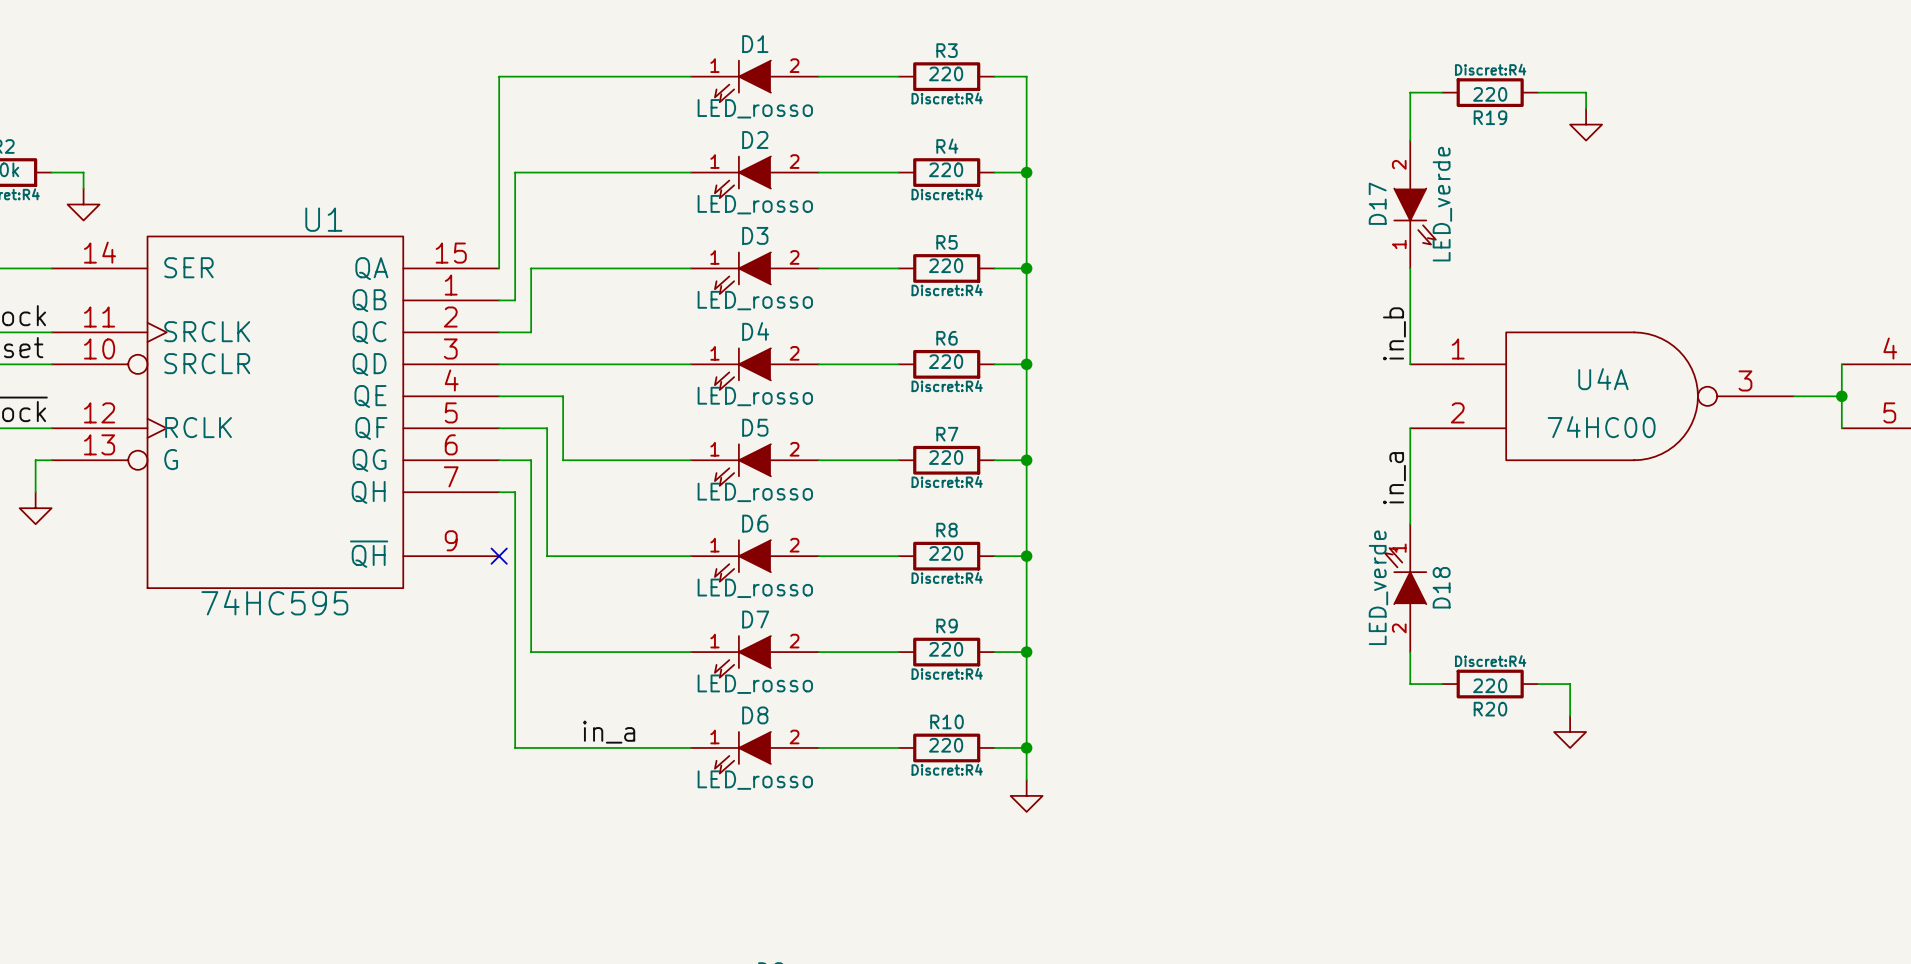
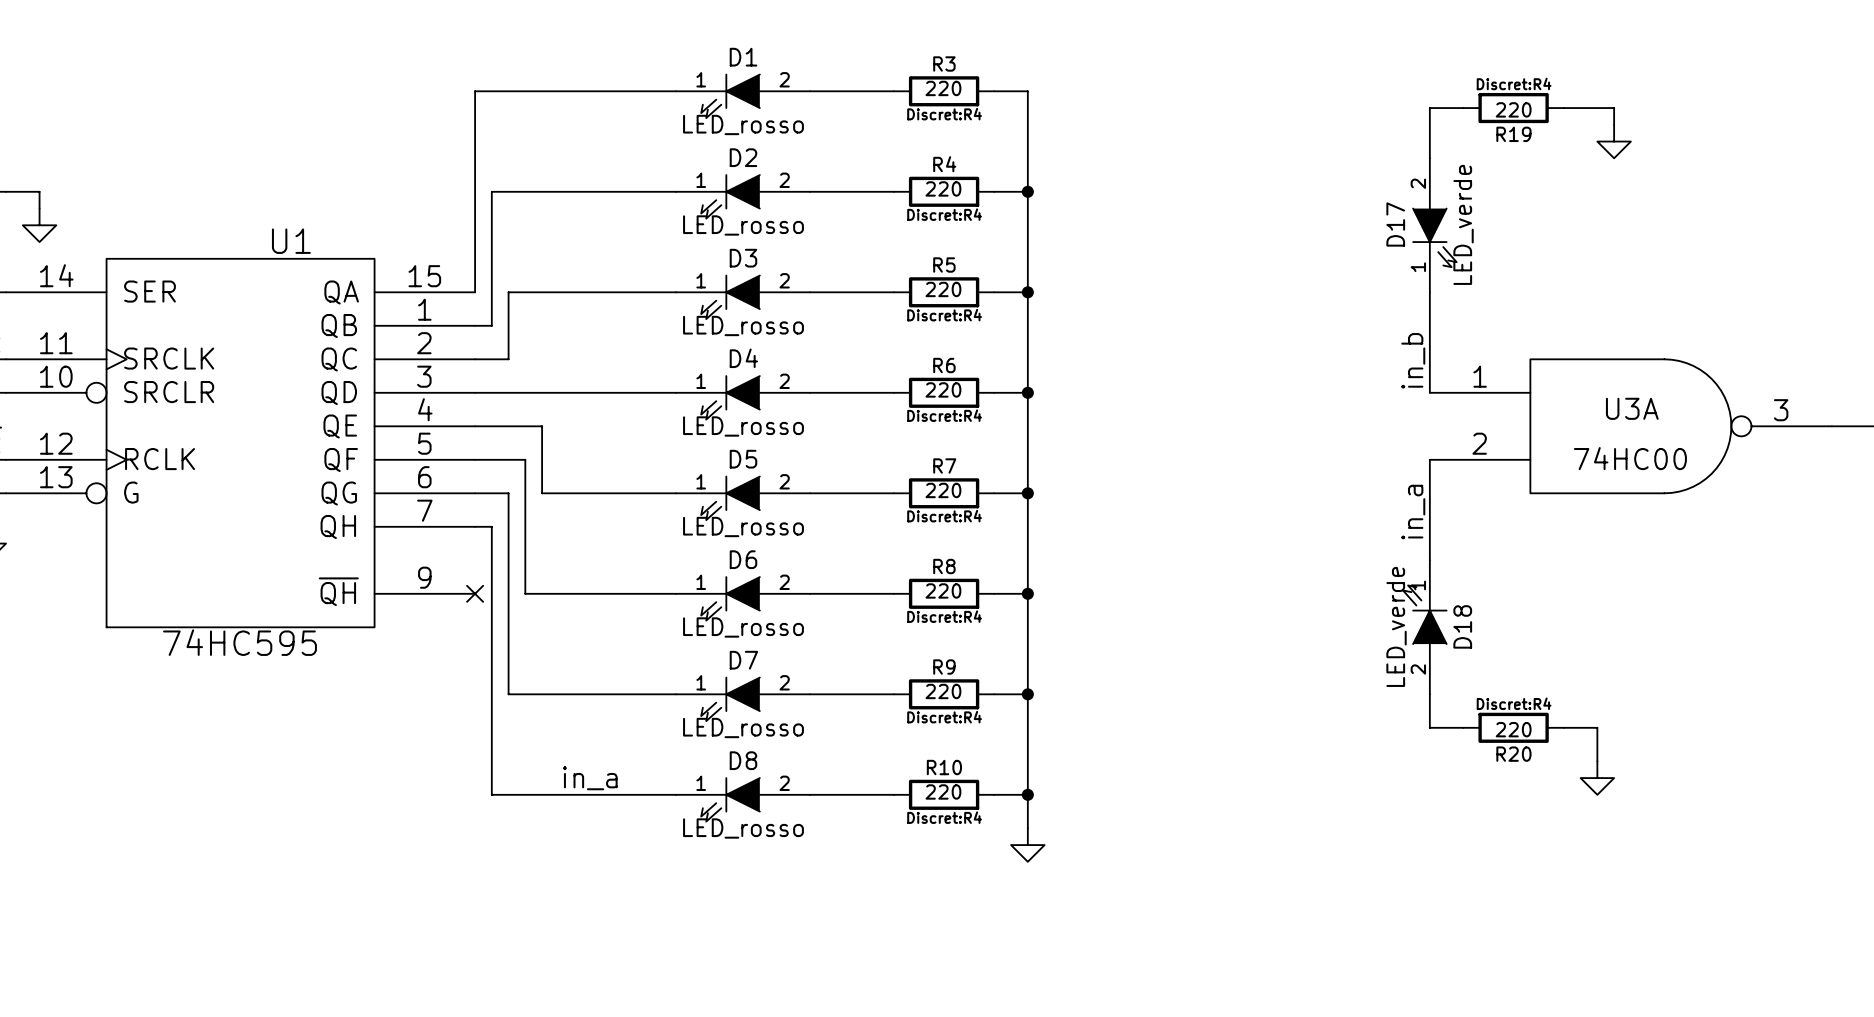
U4A name: U4A (1603, 379) -> U3A (1632, 408)

